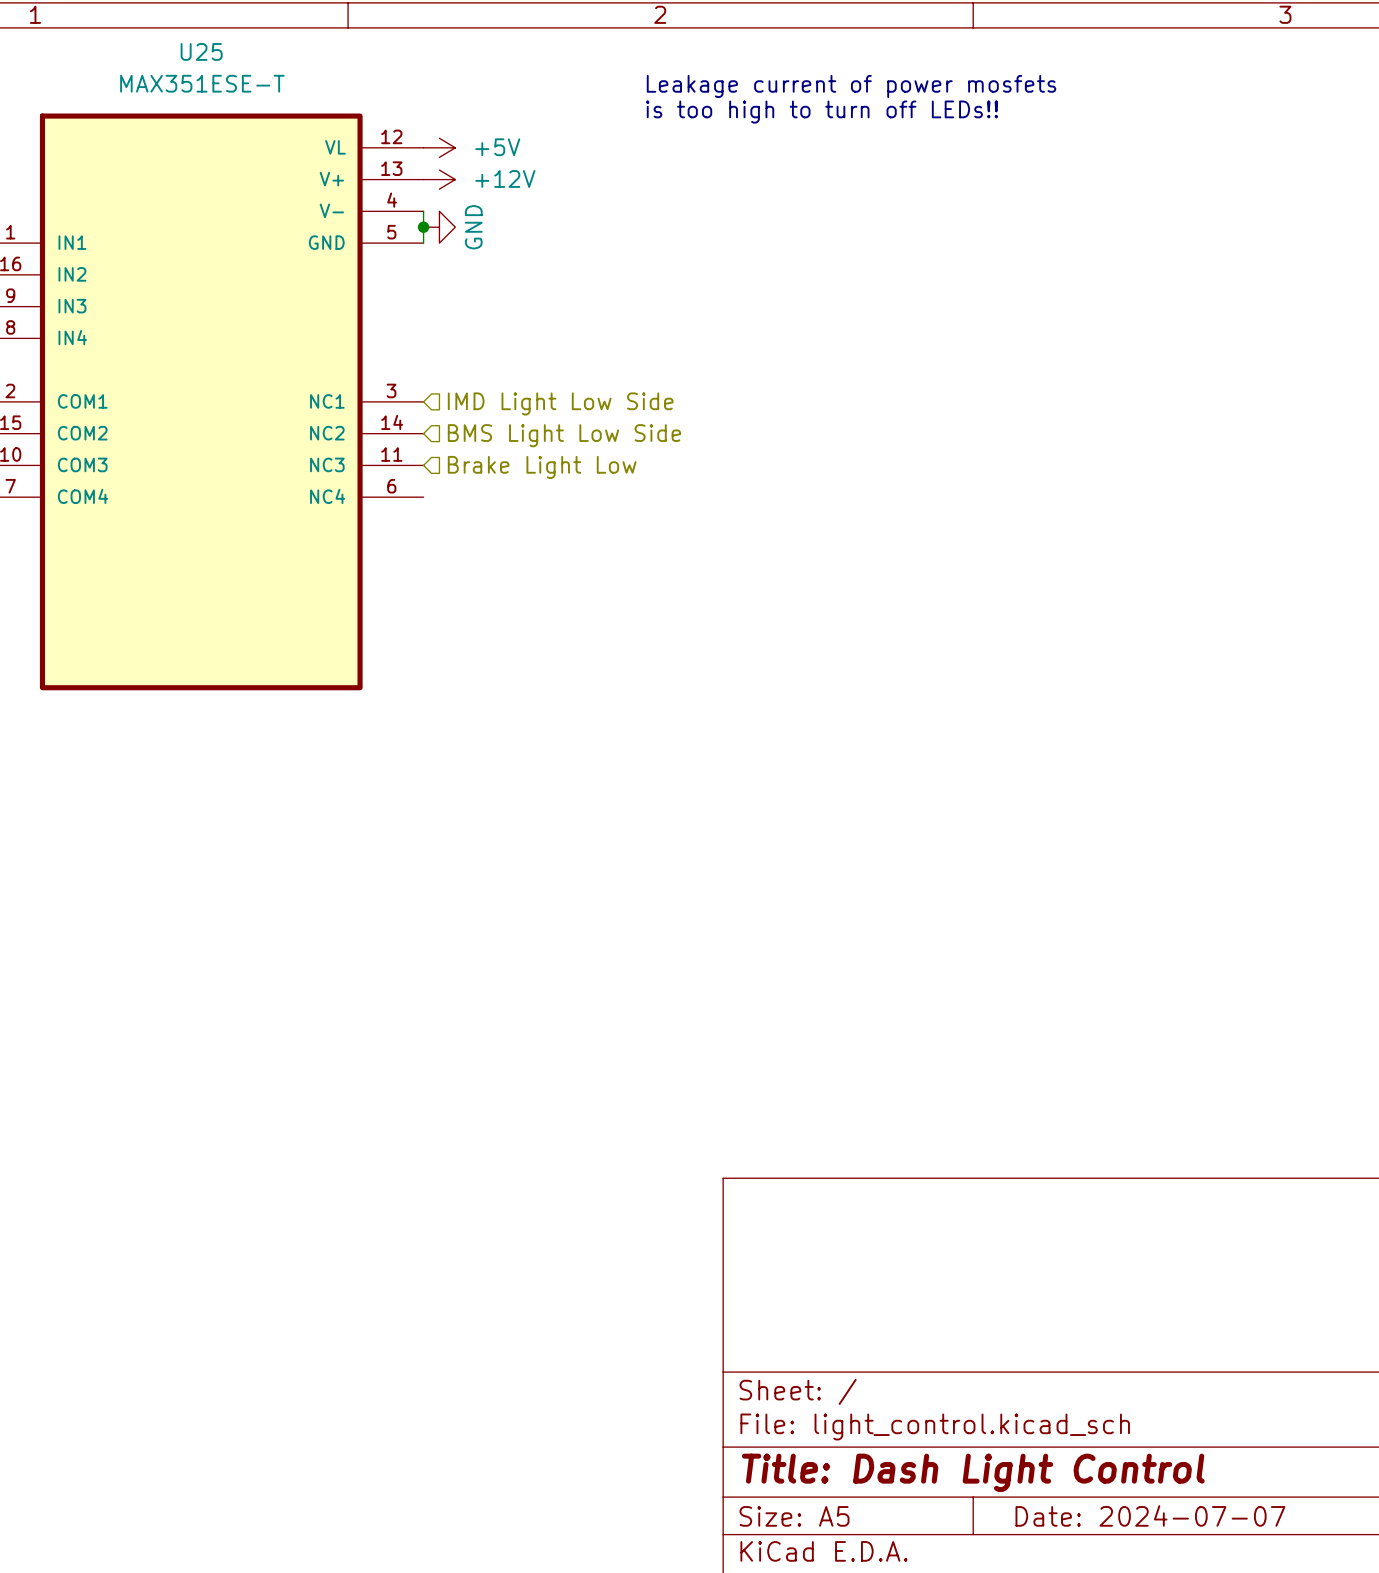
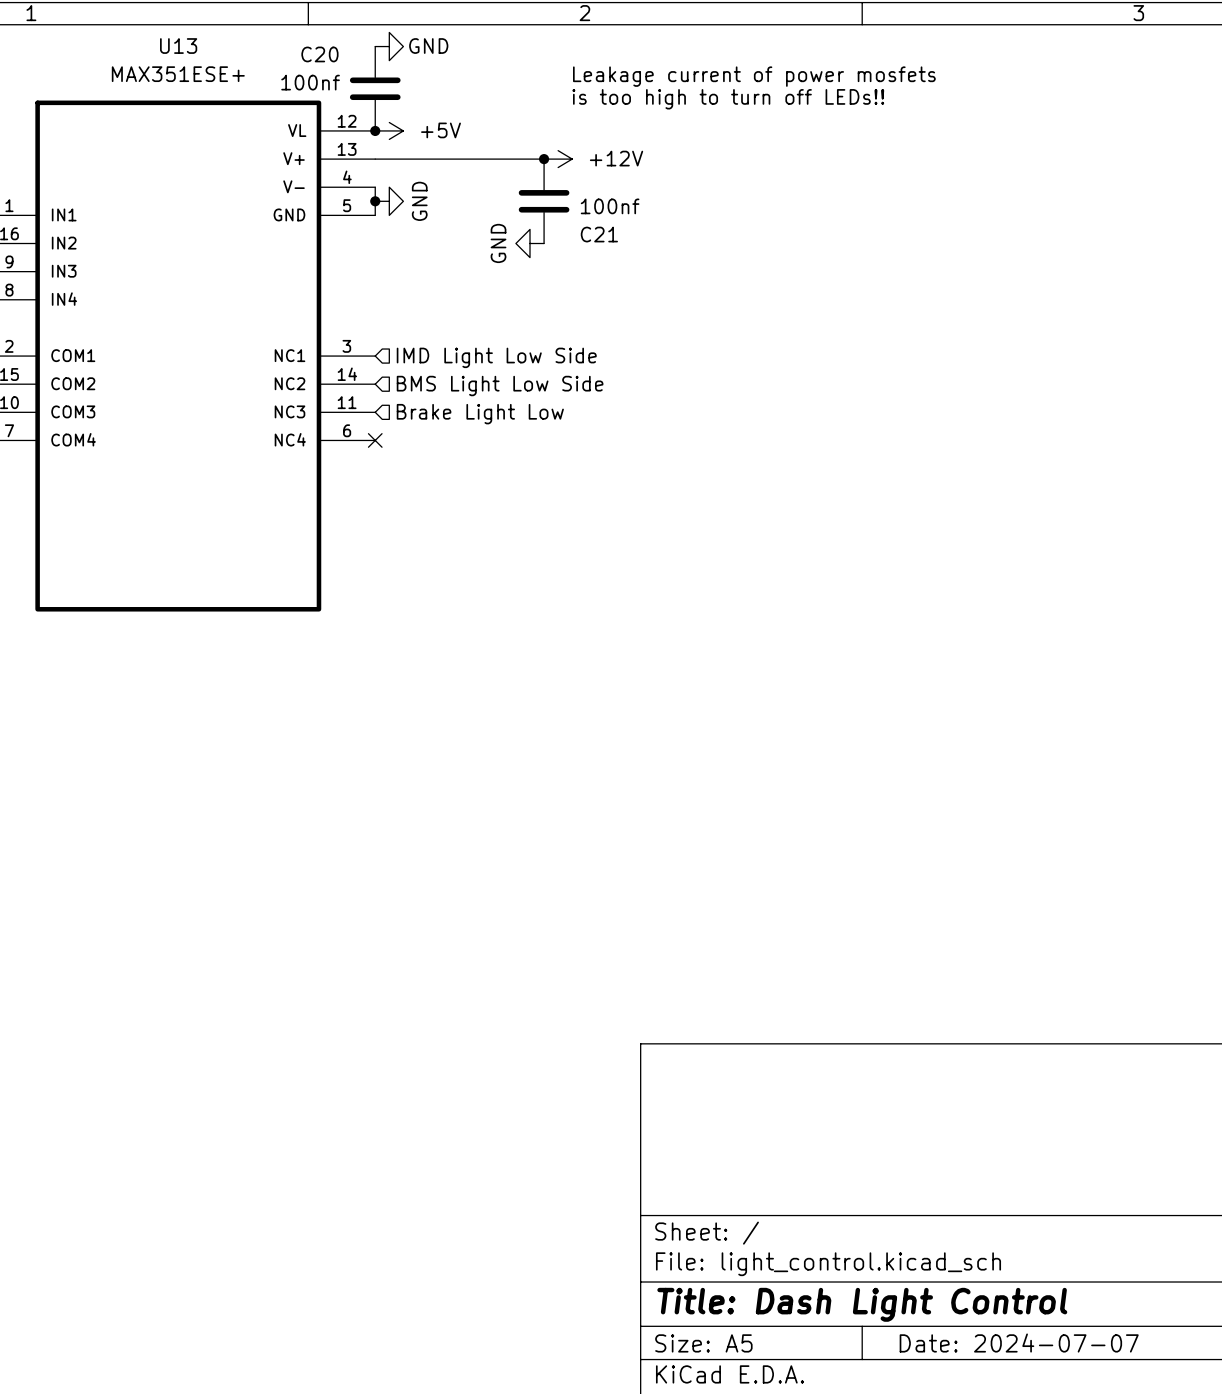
U25 name: U25 (201, 51) -> U13 (178, 46)
power symbol: none -> GND (389, 46)
U25 value: MAX351ESE-T (202, 83) -> MAX351ESE+ (178, 74)
C20: none -> 100nf (375, 88)
junction: none -> (375, 130)
wire: none -> (375, 159) (544, 159)
power symbol position: +12V (439, 179) -> +12V (558, 159)
junction: none -> (544, 159)
C21: none -> 100nf (544, 201)
power symbol: none -> GND (530, 243)
no-connect mark: none -> (375, 440)

